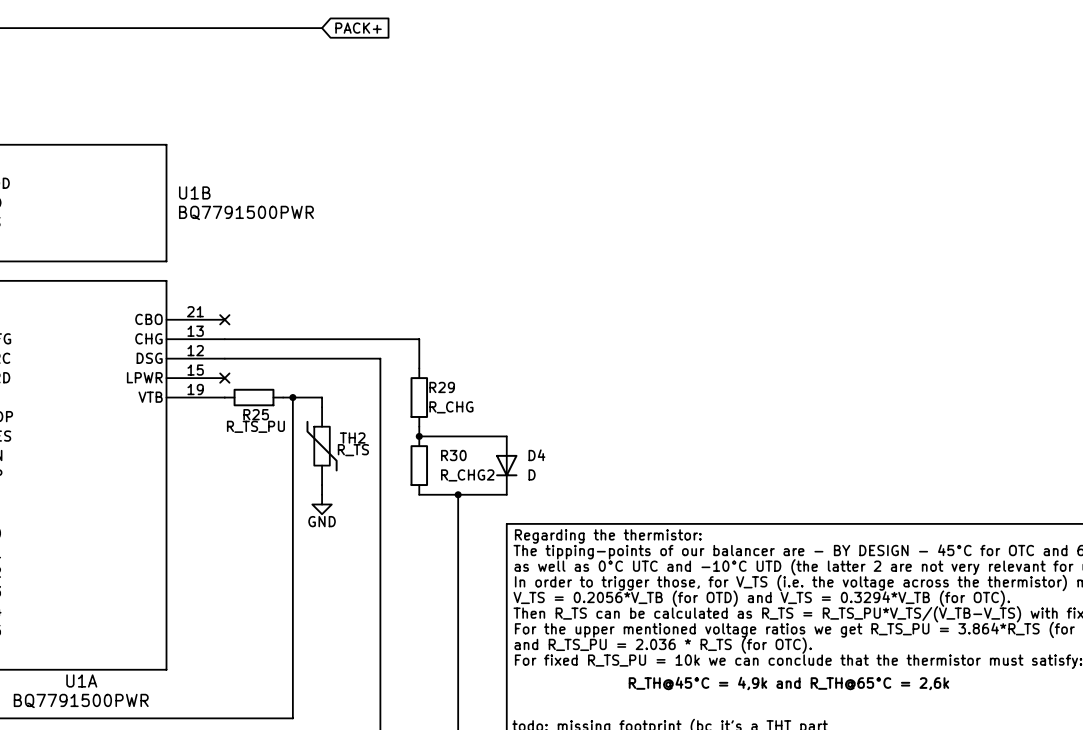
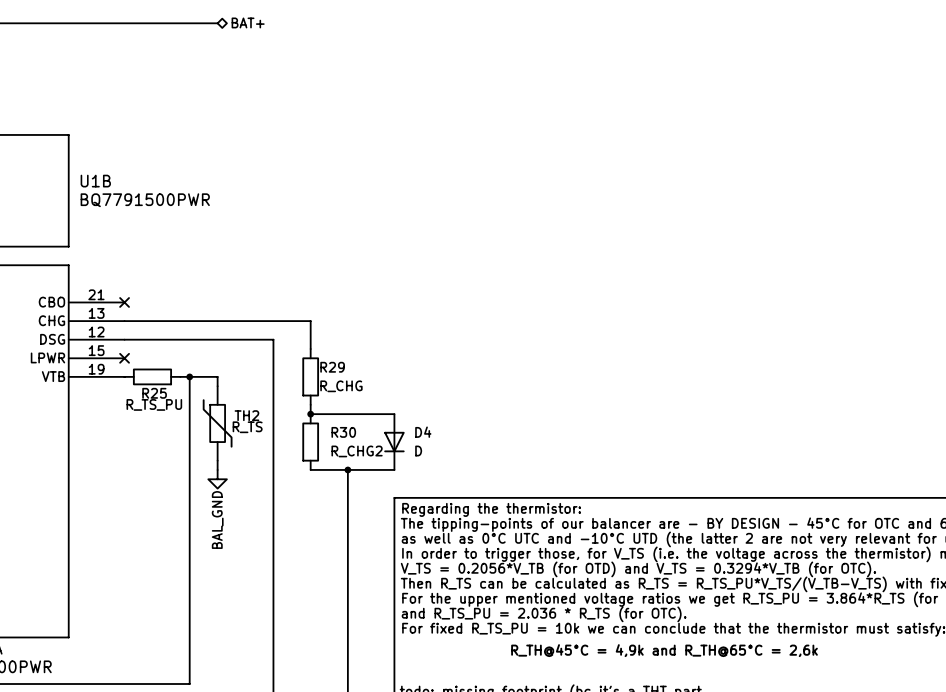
hierarchical label: none -> BAT+ (248, 22)
global label: PACK+ (358, 28) -> none
power symbol: GND (322, 504) -> BAL_GND (217, 479)

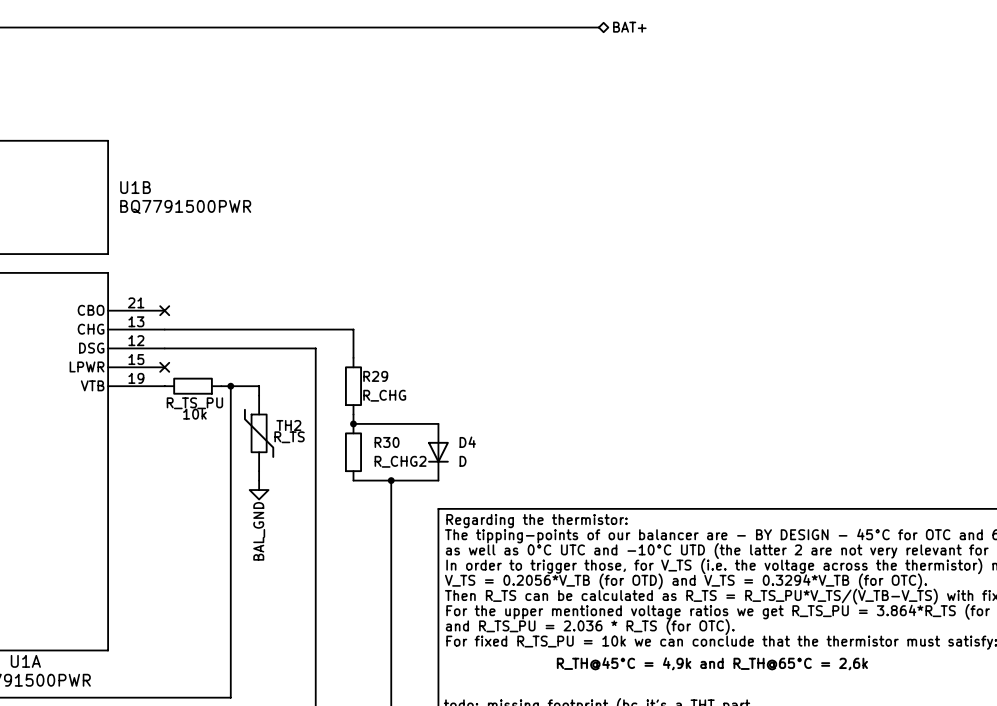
hierarchical label: BAT+ (248, 22) -> none
hierarchical label: none -> BAT+ (629, 27)
wire: none -> (259, 27) (598, 27)
R25 name: R25 (154, 393) -> R_TS_PU (194, 403)
R25 value: R_TS_PU (154, 404) -> 10k (194, 414)

